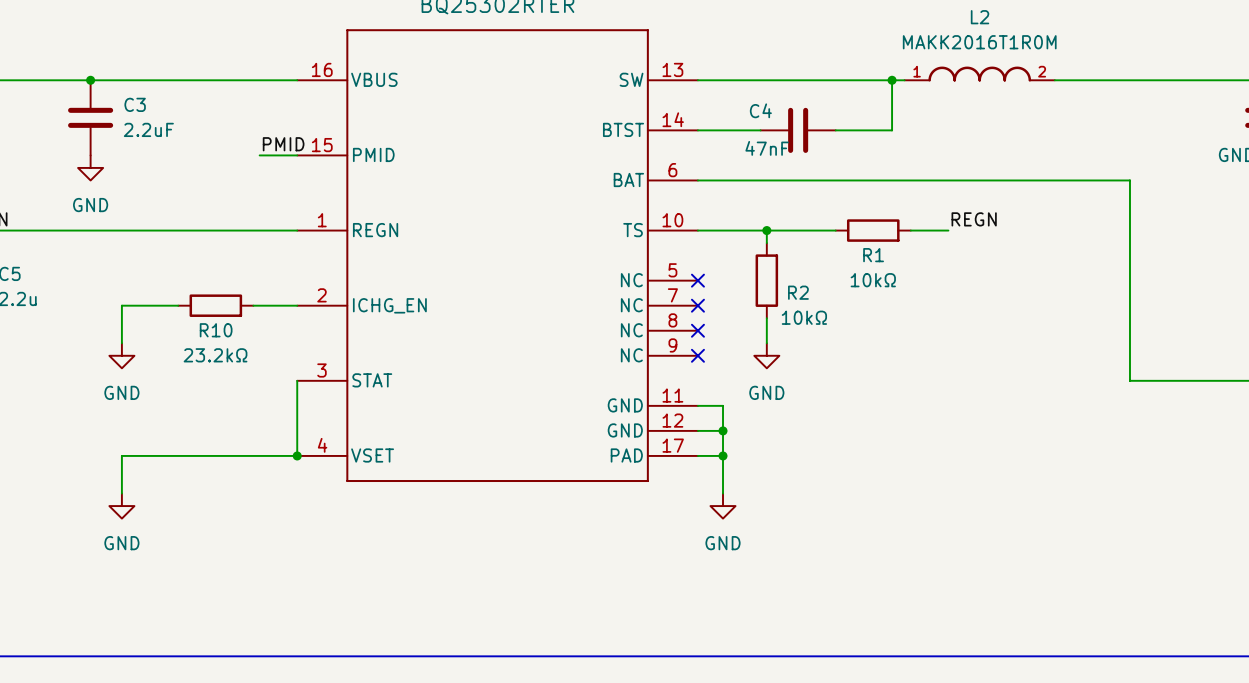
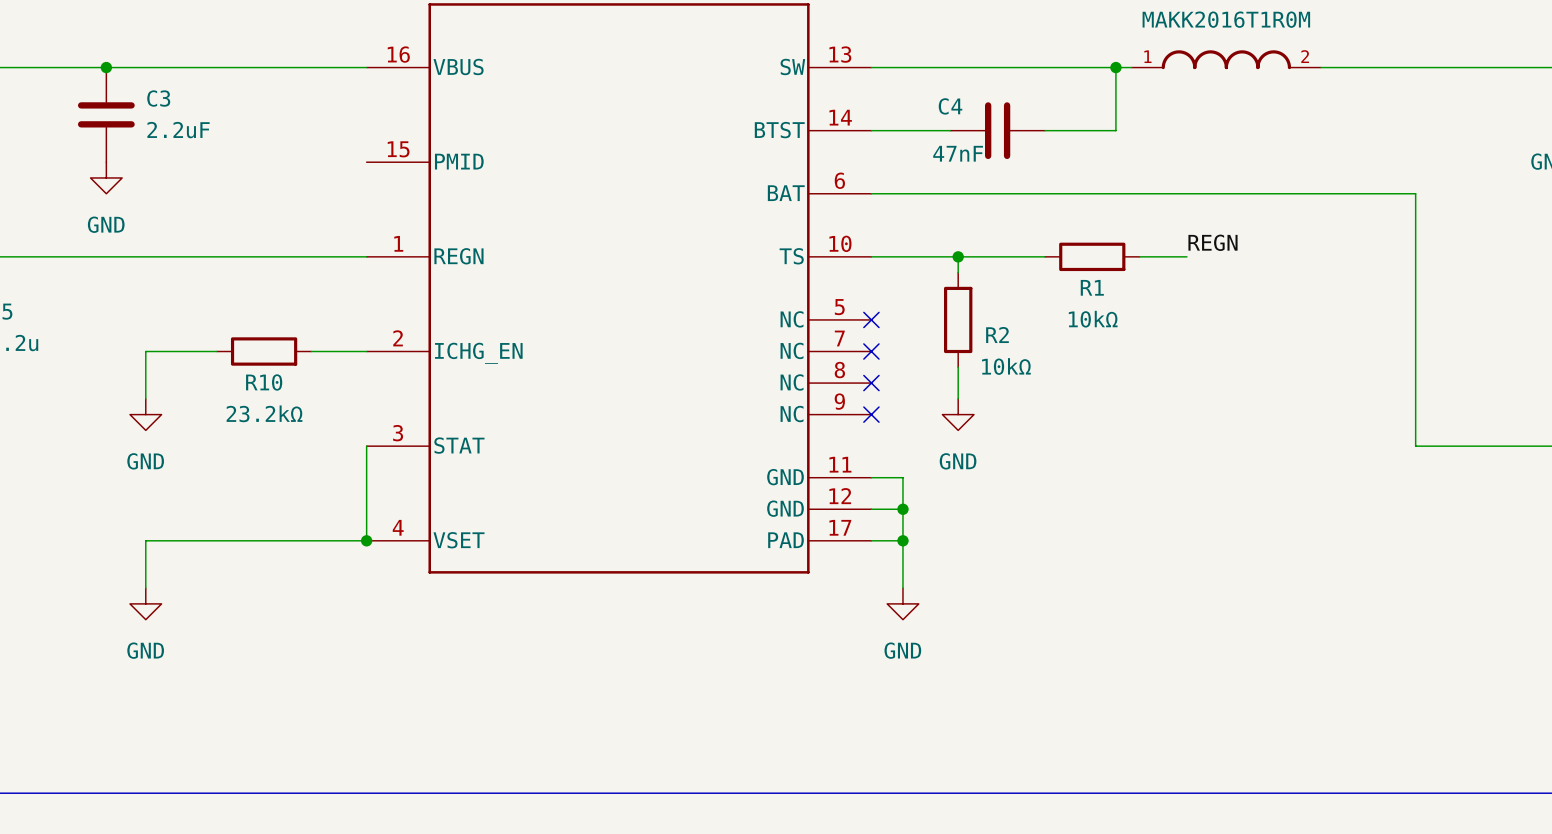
label: PMID (283, 144) -> none
wire: (259, 155) (297, 155) -> none

